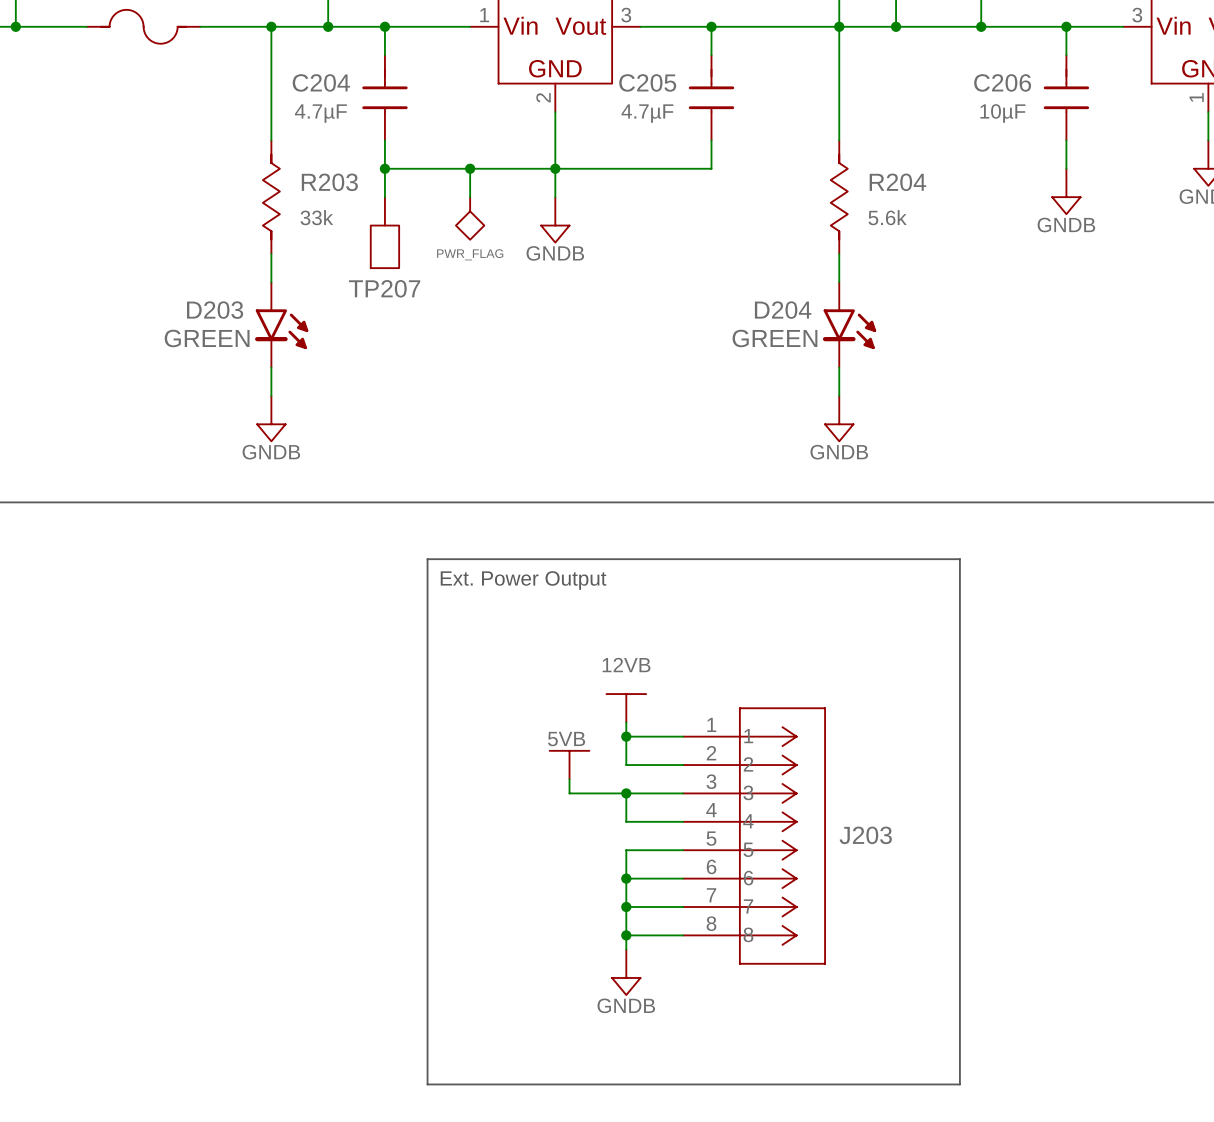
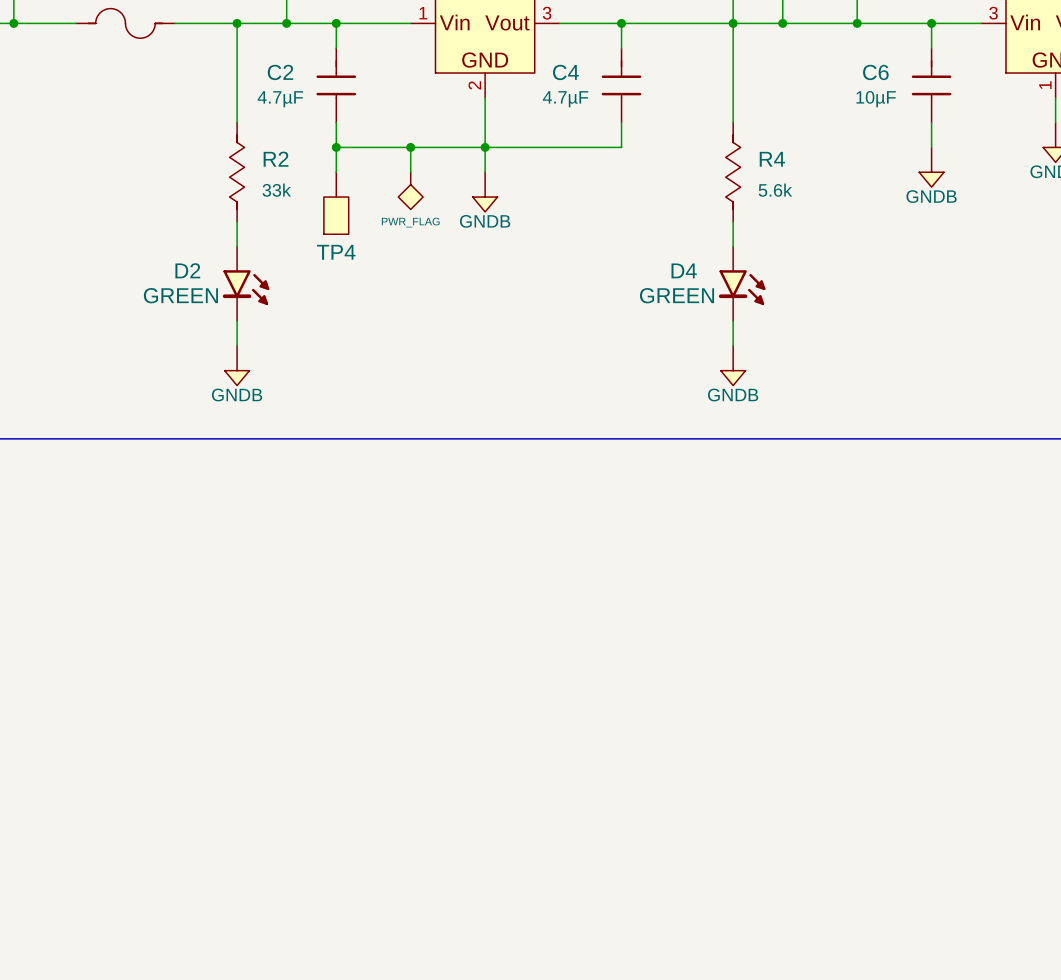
C204 name: C204 (321, 82) -> C2 (280, 72)
C205 name: C205 (647, 82) -> C4 (565, 72)
C206 name: C206 (1002, 82) -> C6 (875, 72)
R203 name: R203 (329, 182) -> R2 (276, 159)
R204 name: R204 (897, 182) -> R4 (772, 159)
TP207 name: TP207 (384, 288) -> TP4 (336, 252)
D203 name: D203 (215, 310) -> D2 (187, 270)
D204 name: D204 (783, 310) -> D4 (684, 270)
line: (427, 559) (959, 559) (959, 1084) (427, 1084) (427, 559) -> none
text: Ext. Power Output (523, 580) -> none
power symbol: 12VB (626, 708) -> none
wire: (626, 722) (626, 765) (683, 765) -> none
wire: (626, 736) (683, 736) -> none
junction: (626, 736) -> none
power symbol: 5VB (569, 765) -> none
wire: (569, 779) (569, 793) (683, 793) -> none
wire: (626, 793) (626, 821) (683, 821) -> none
junction: (626, 793) -> none
J203: (754, 836) -> none
wire: (683, 850) (626, 850) (626, 949) -> none
wire: (626, 878) (683, 878) -> none
junction: (626, 878) -> none
wire: (626, 907) (683, 907) -> none
junction: (626, 907) -> none
wire: (626, 935) (683, 935) -> none
junction: (626, 935) -> none
power symbol: GNDB (626, 972) -> none

